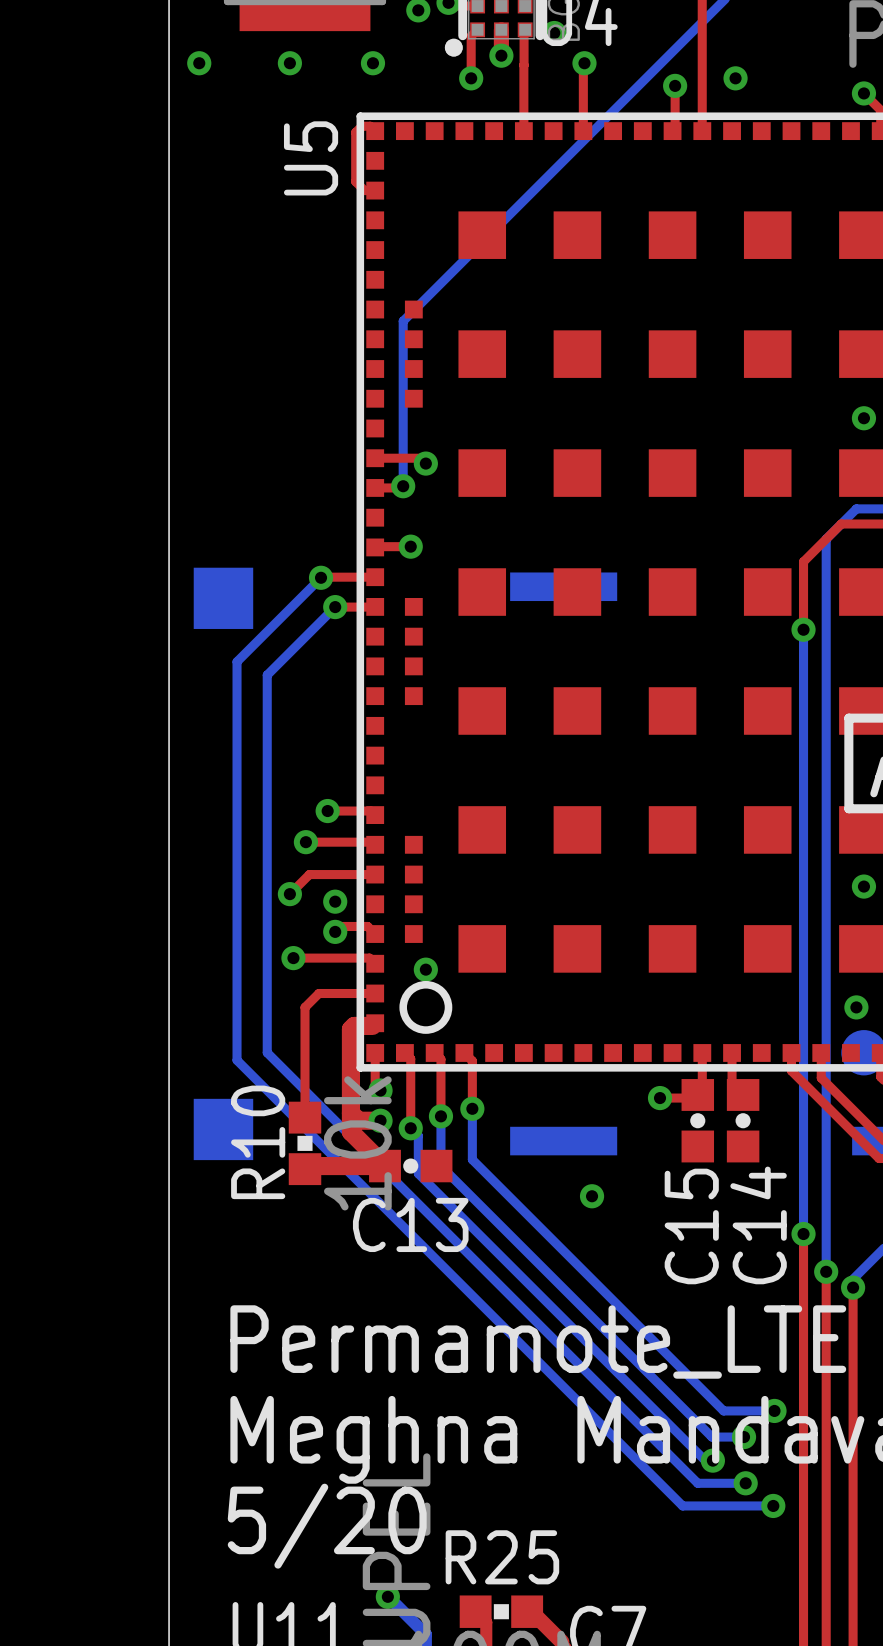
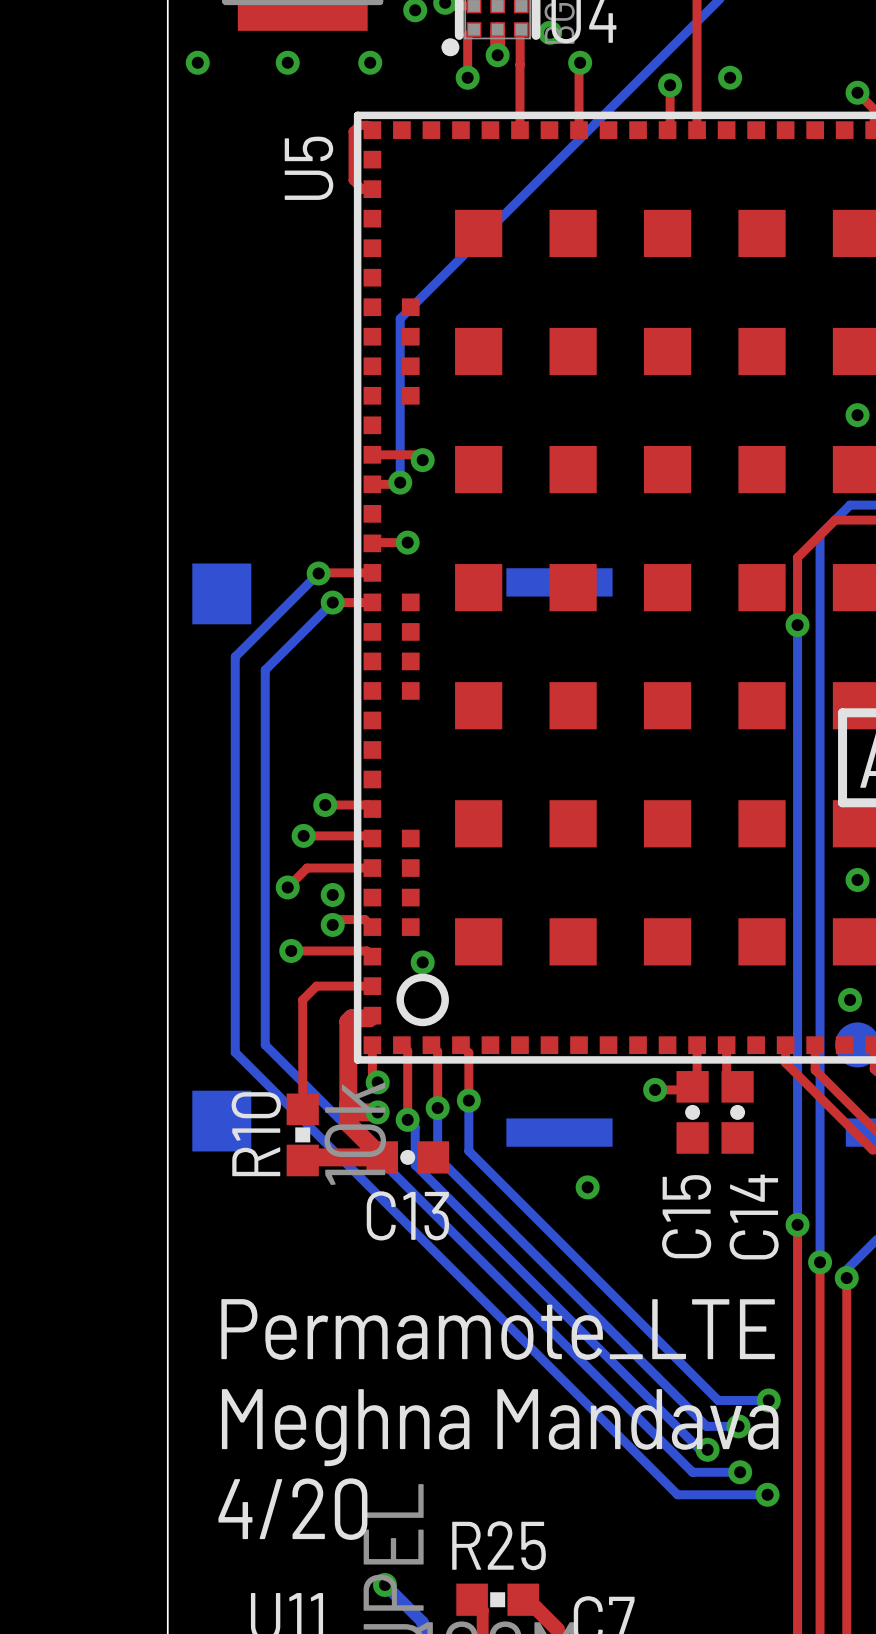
text: 5/20 (327, 1526) -> 4/20 (292, 1509)

